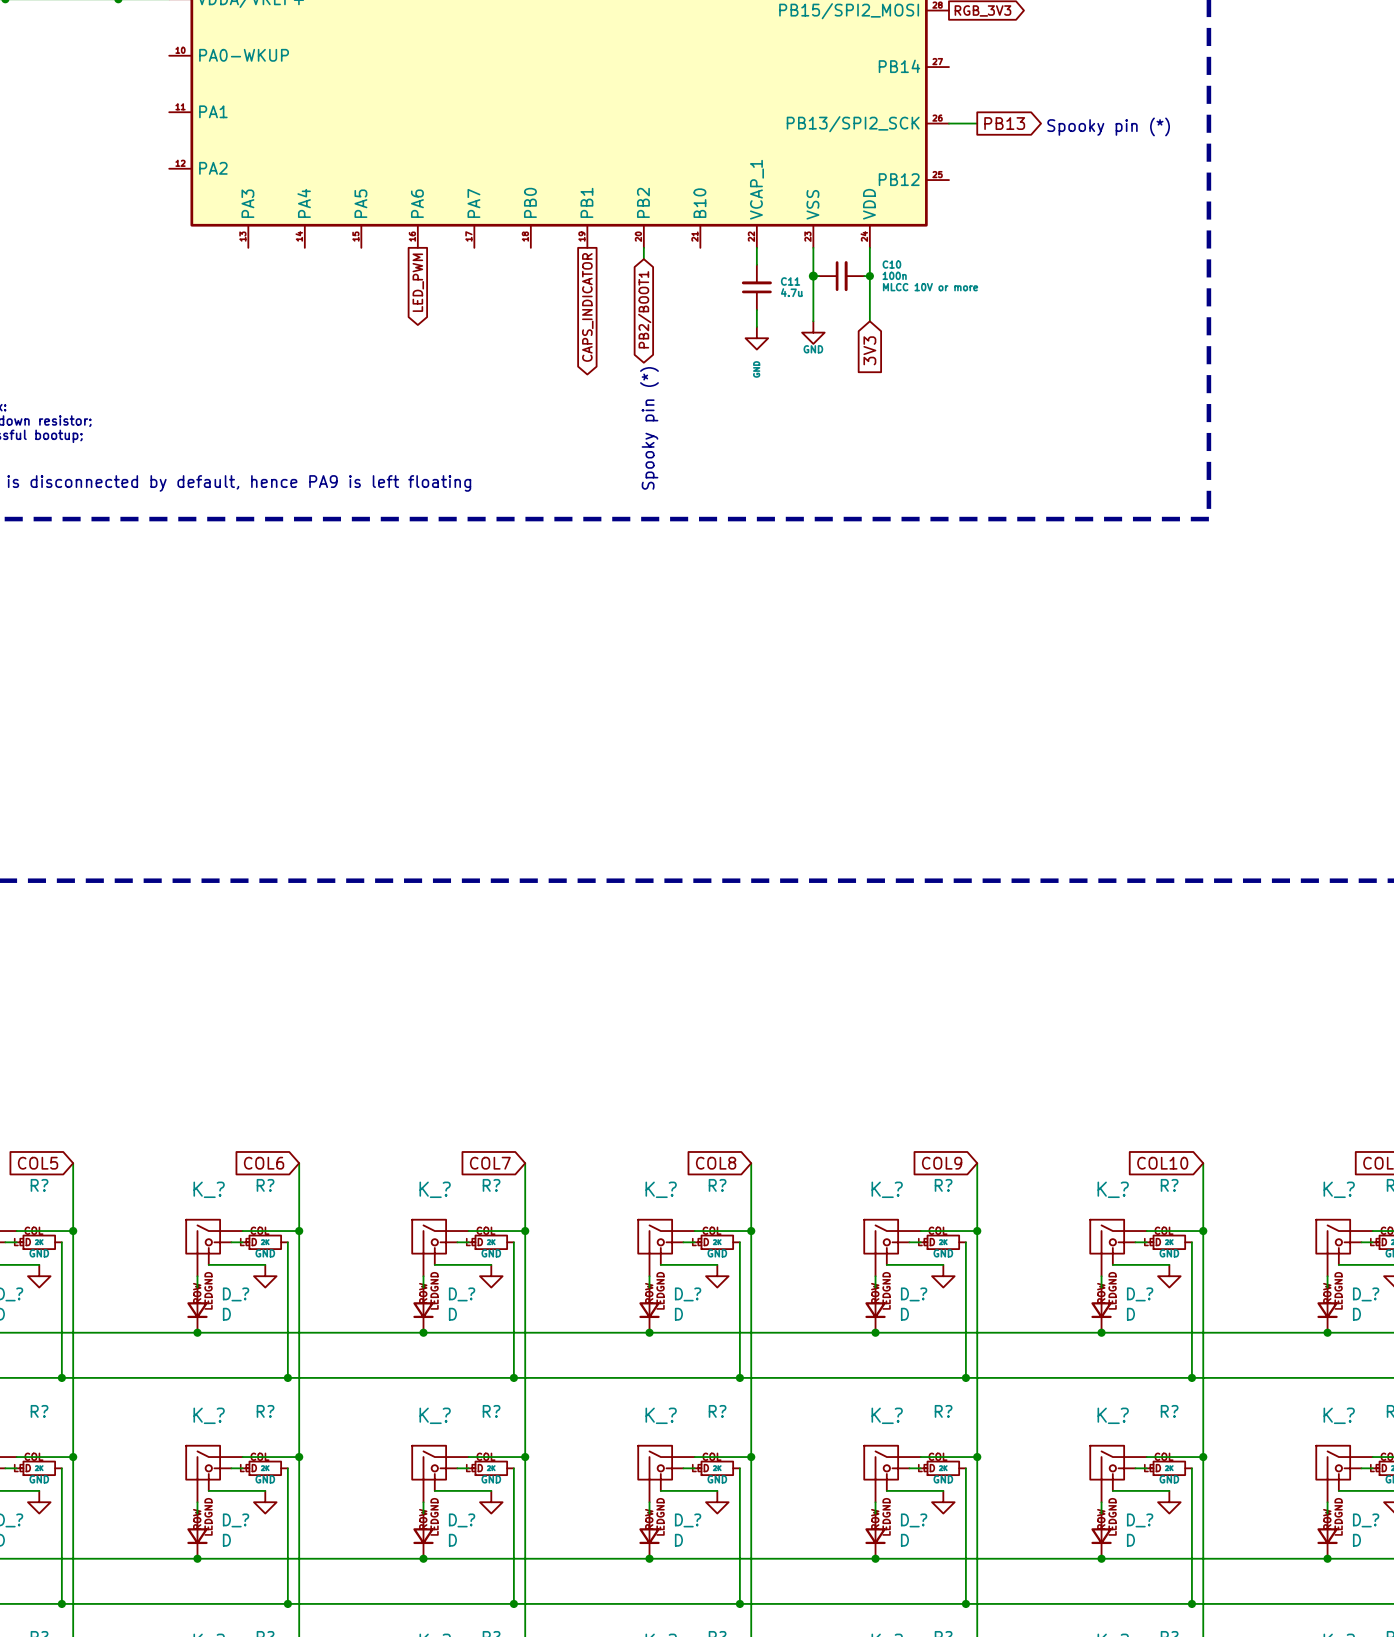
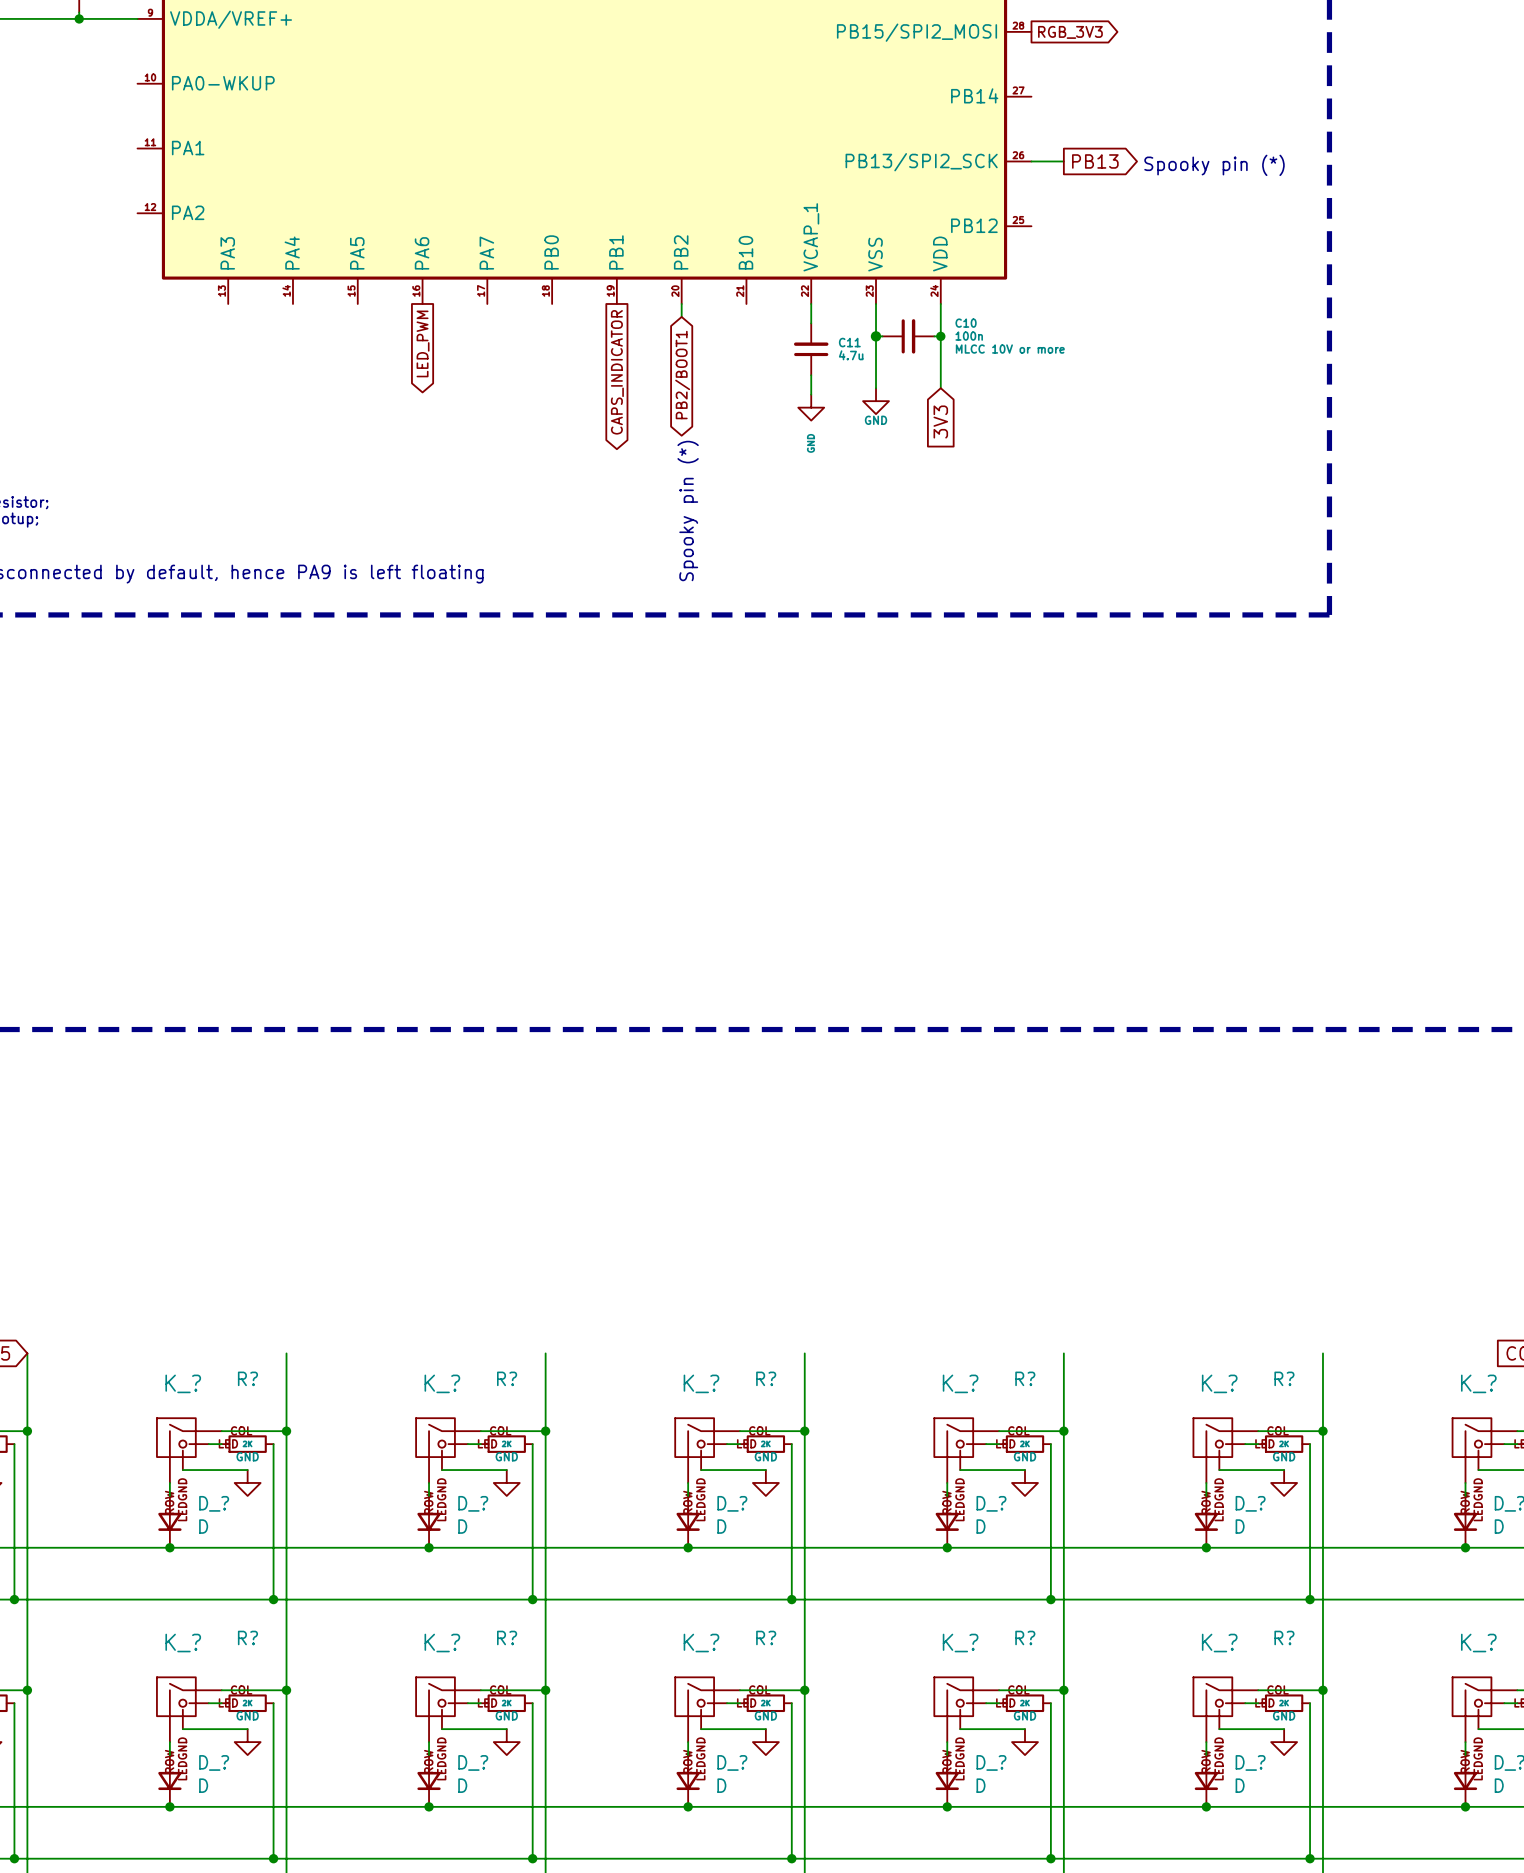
global label: COL6 (264, 1163) -> none
global label: COL7 (490, 1163) -> none
global label: COL8 (716, 1163) -> none
global label: COL9 (942, 1163) -> none
global label: COL10 (1162, 1163) -> none

